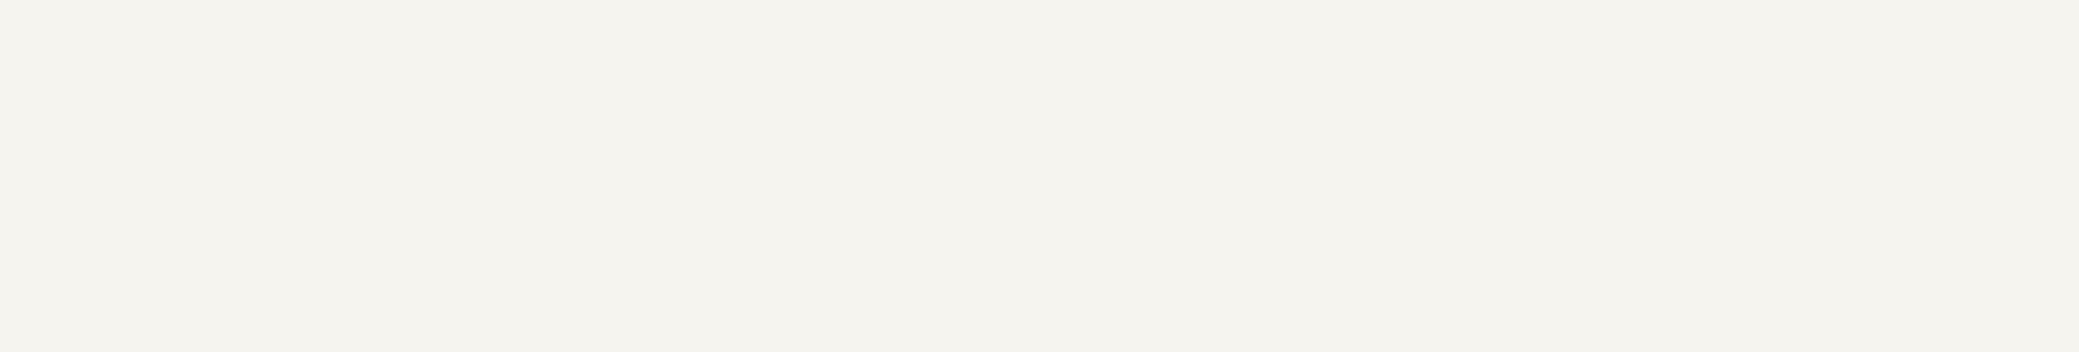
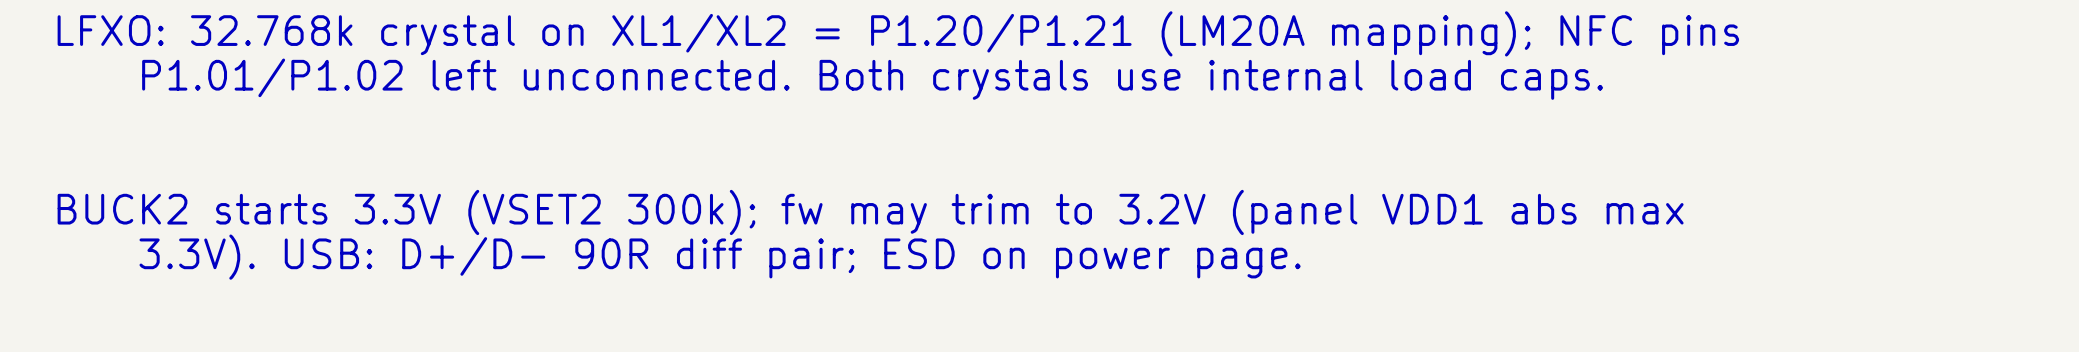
text: none -> LFXO: 32.768k crystal on XL1/XL2 = P1.20/P1.21 (LM20A mapping); NFC pins (898, 33)
text: none -> P1.01/P1.02 left unconnected. Both crystals use internal load caps. (872, 79)
text: none -> BUCK2 starts 3.3V (VSET2 300k); fw may trim to 3.2V (panel VDD1 abs max (870, 212)
text: none -> 3.3V). USB: D+/D- 90R diff pair; ESD on power page. (720, 257)

